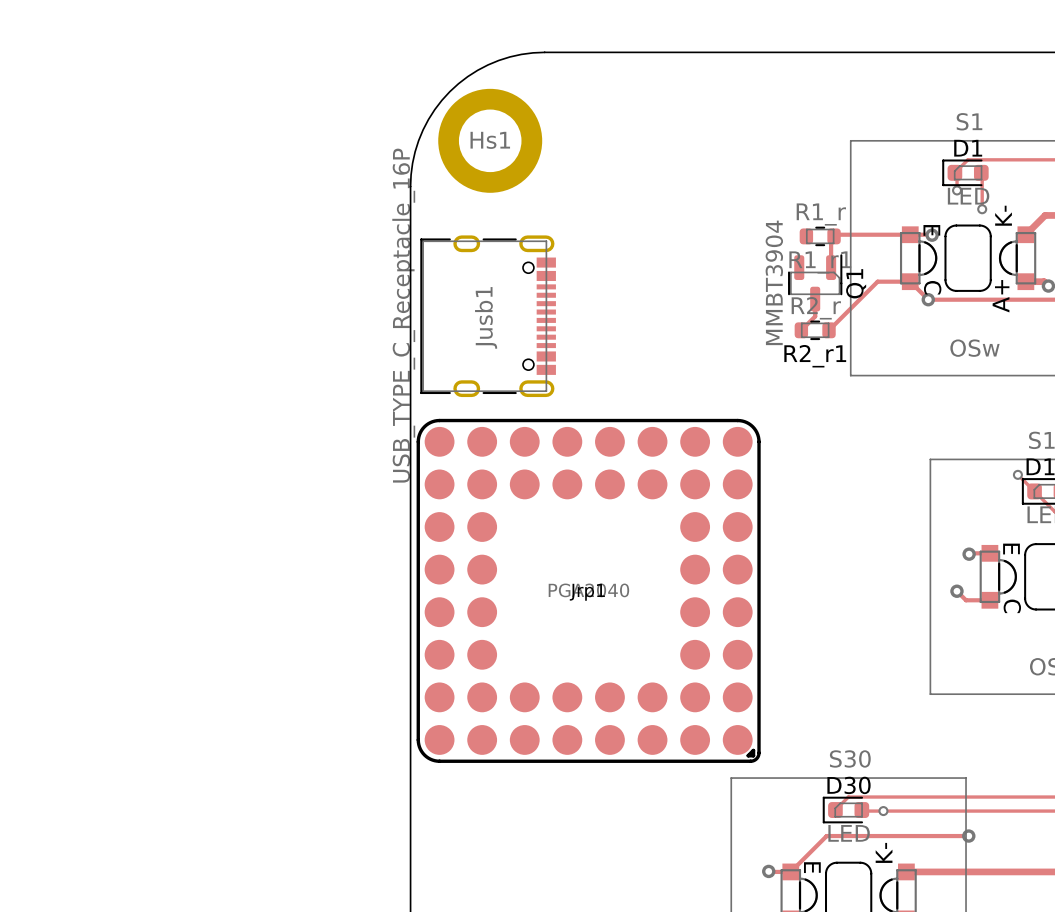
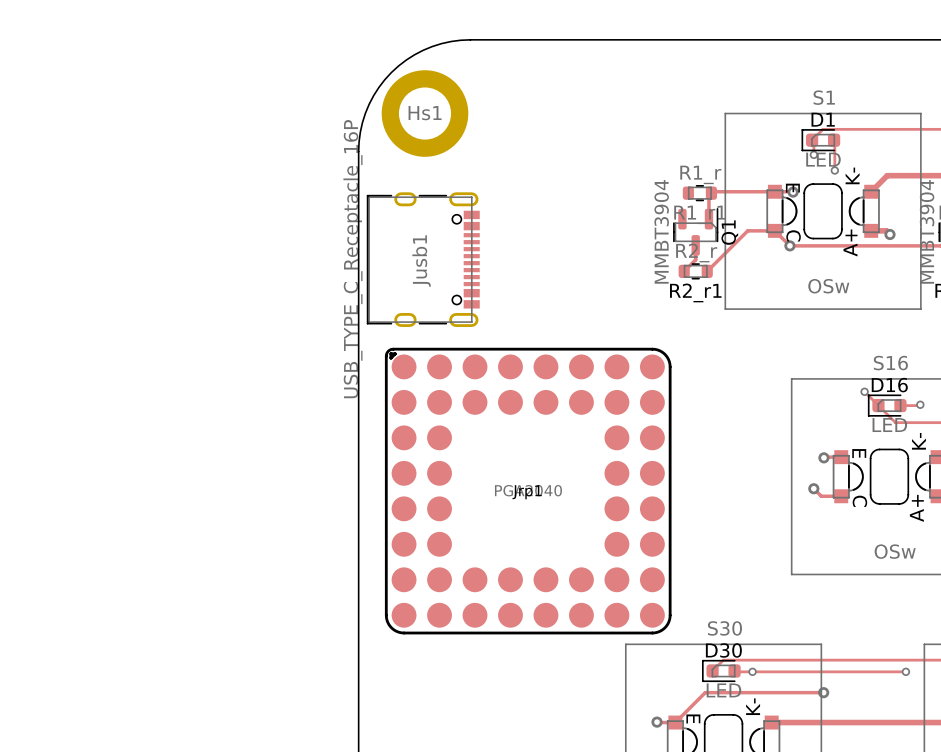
Jrp1 rotation: 0° (588, 590) -> 180° (528, 491)

